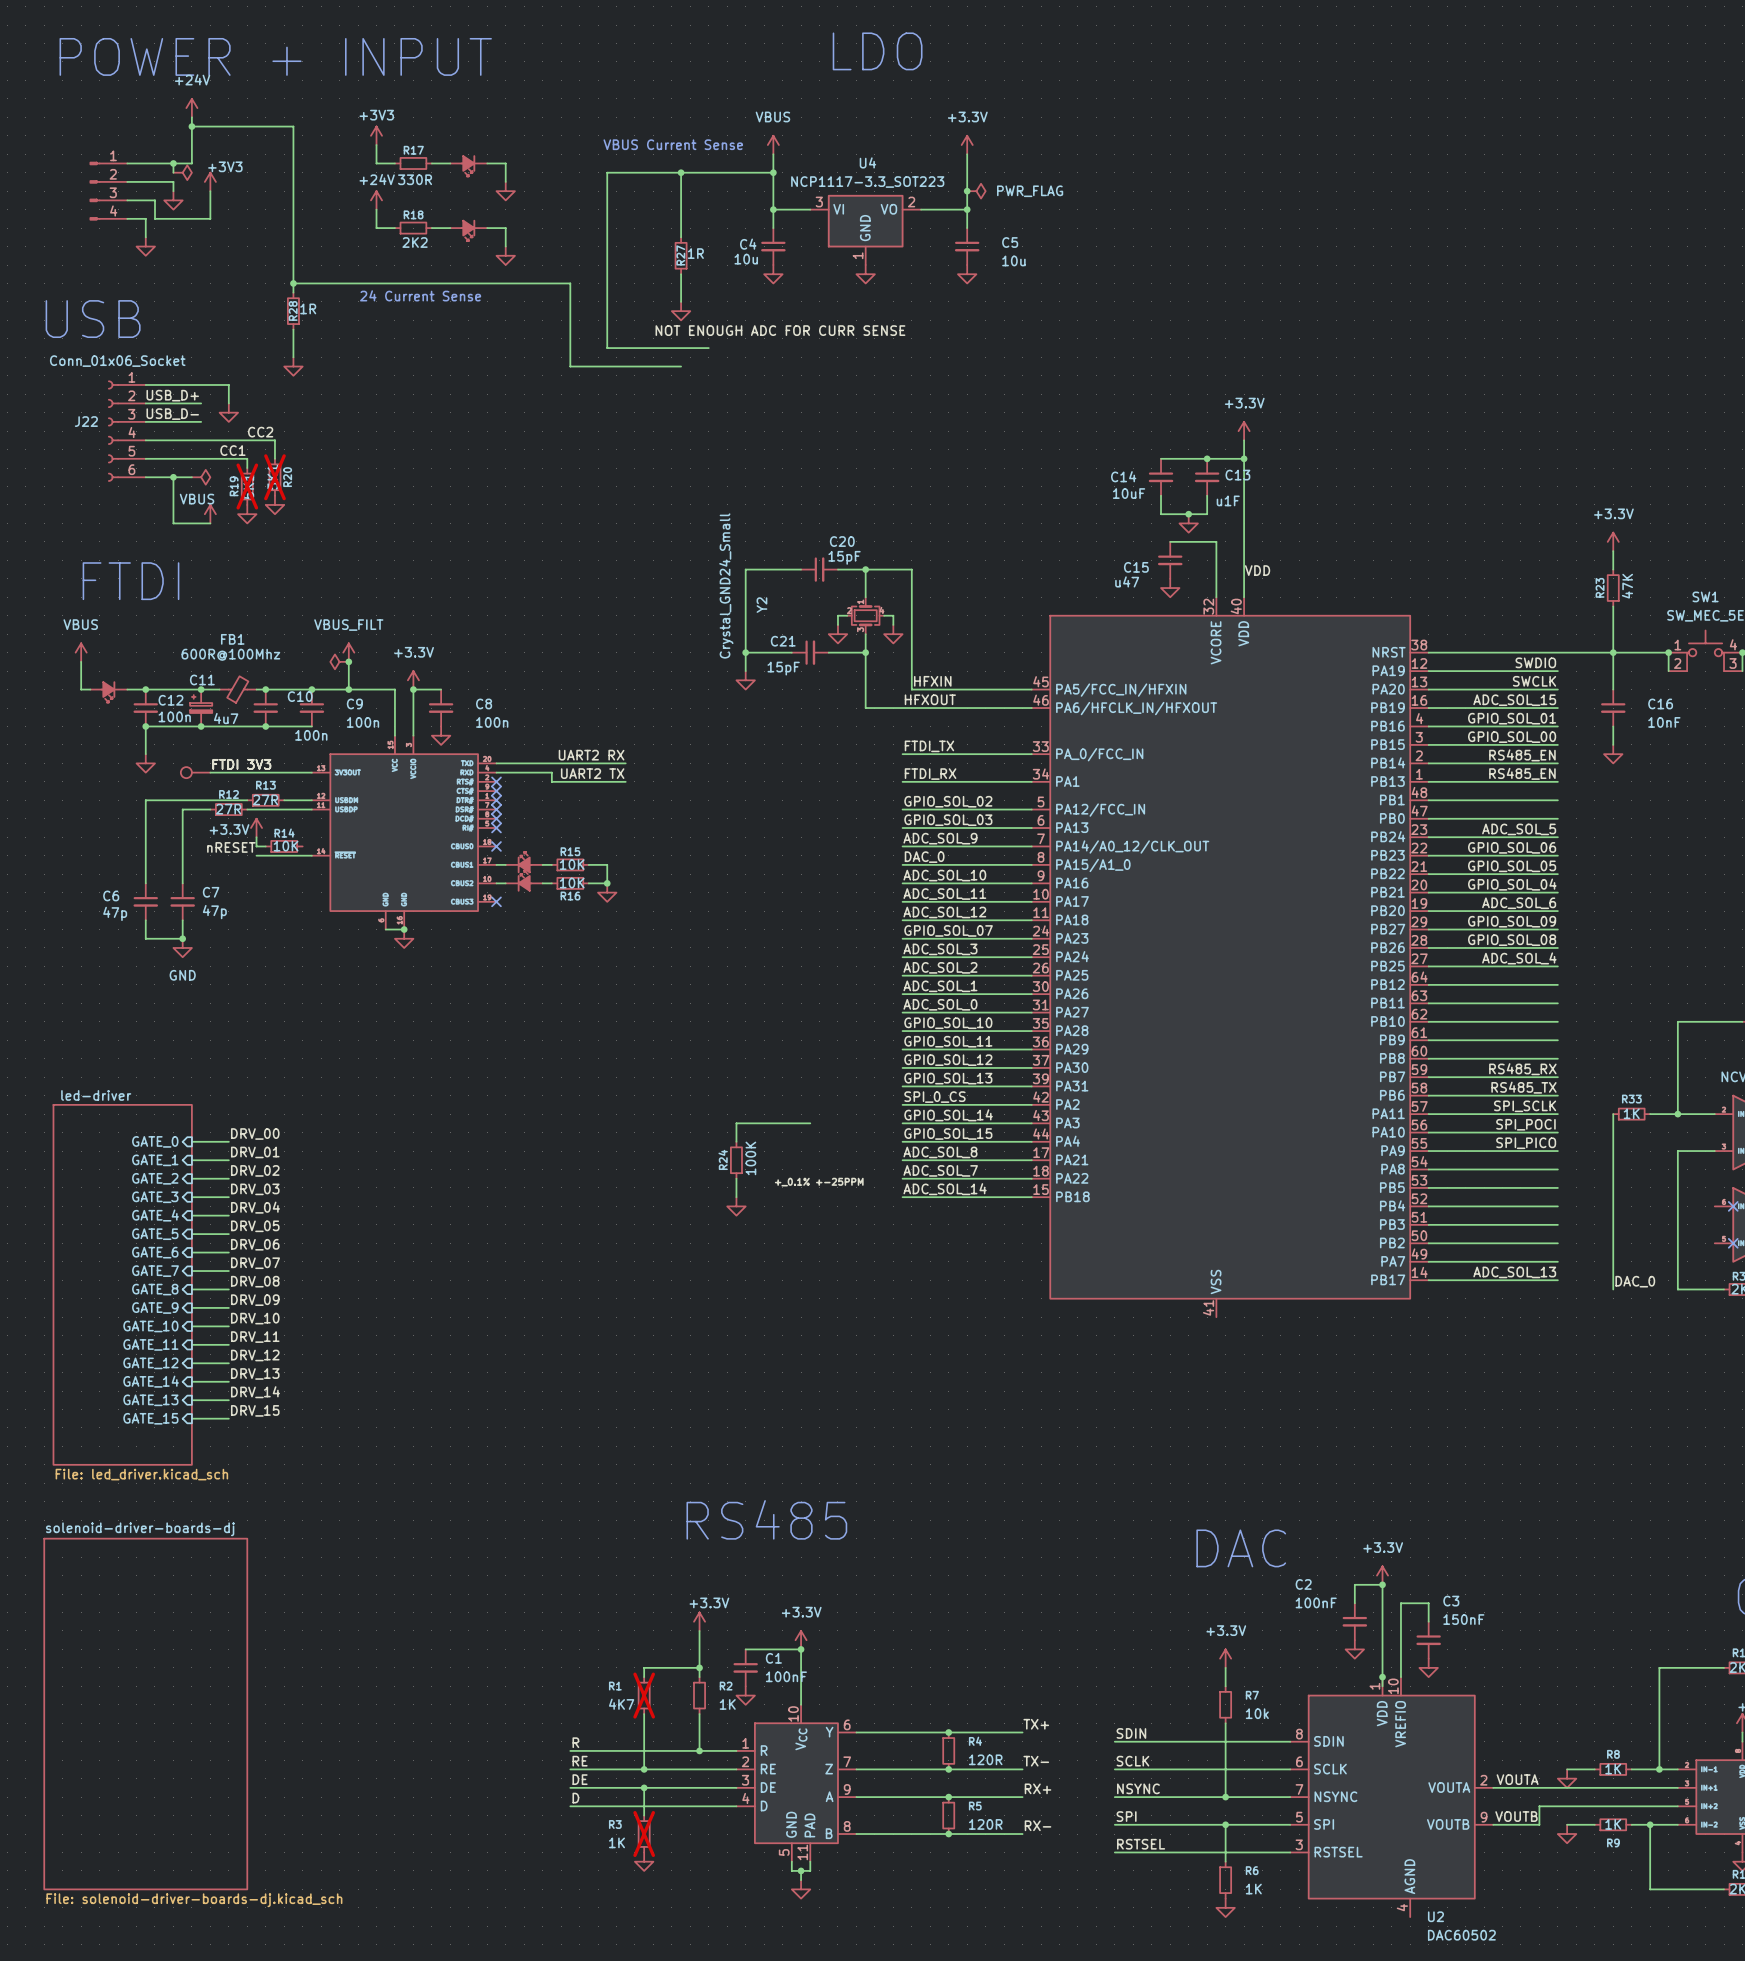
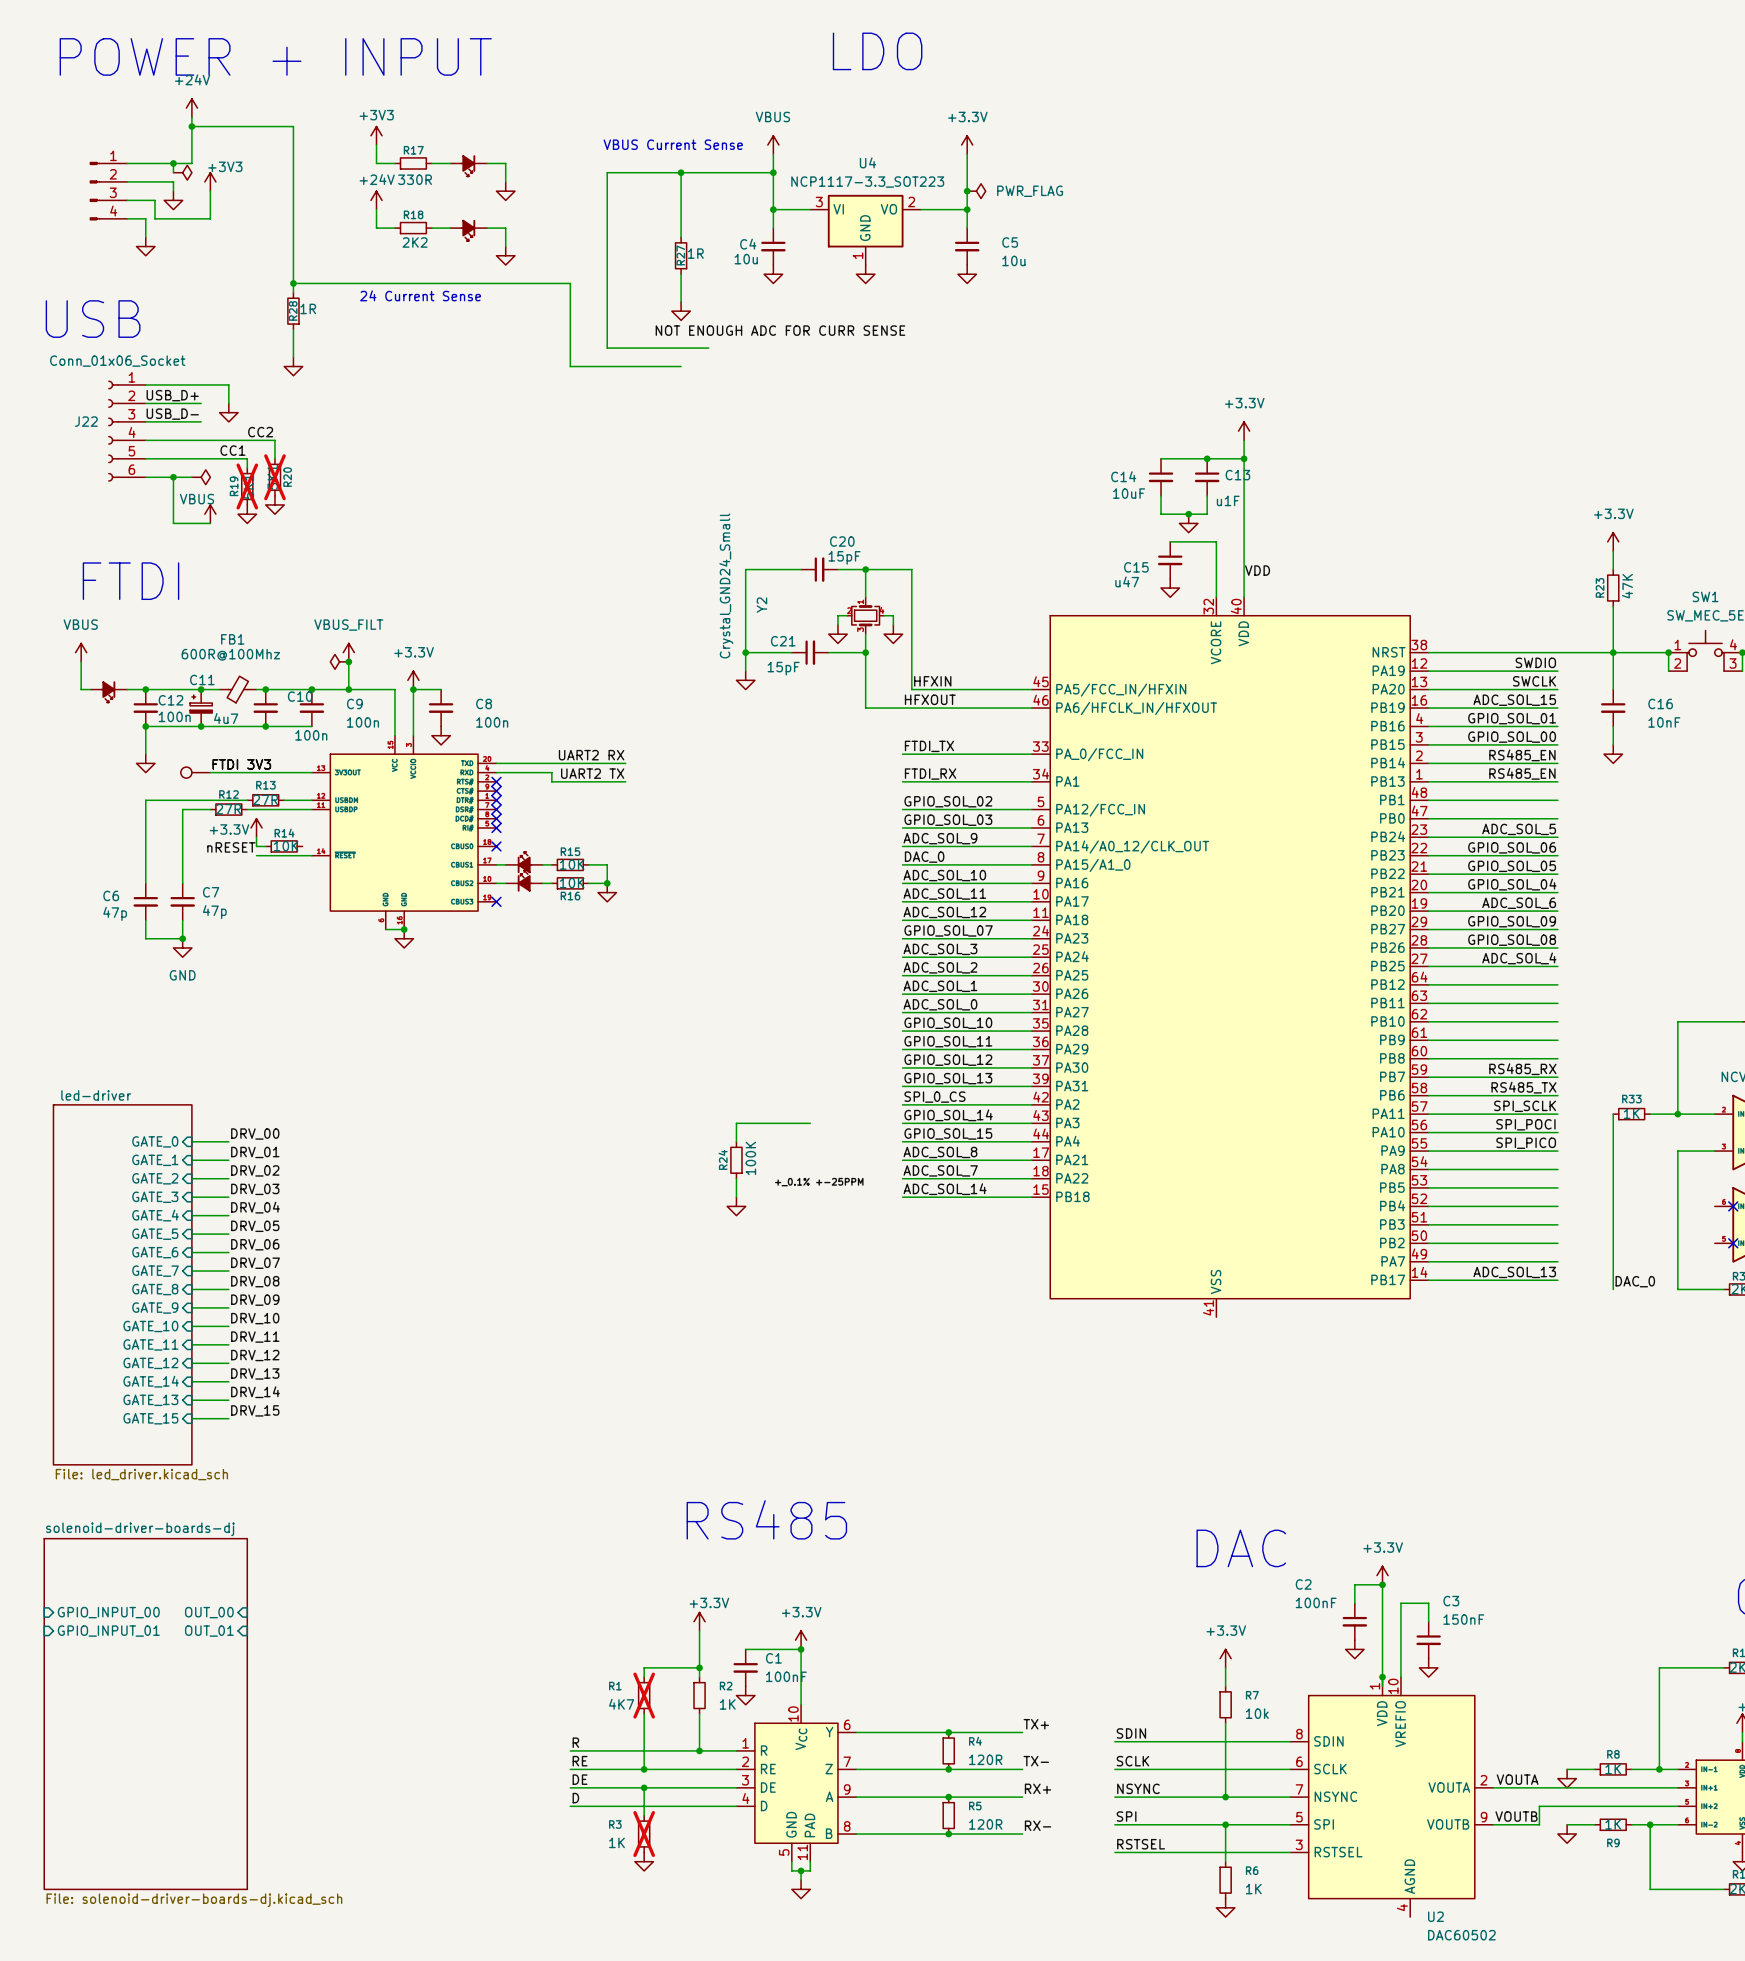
sheet pin: none -> GPIO_INPUT_00 (108, 1612)
sheet pin: none -> OUT_00 (209, 1612)
sheet pin: none -> GPIO_INPUT_01 (108, 1631)
sheet pin: none -> OUT_01 (209, 1631)

